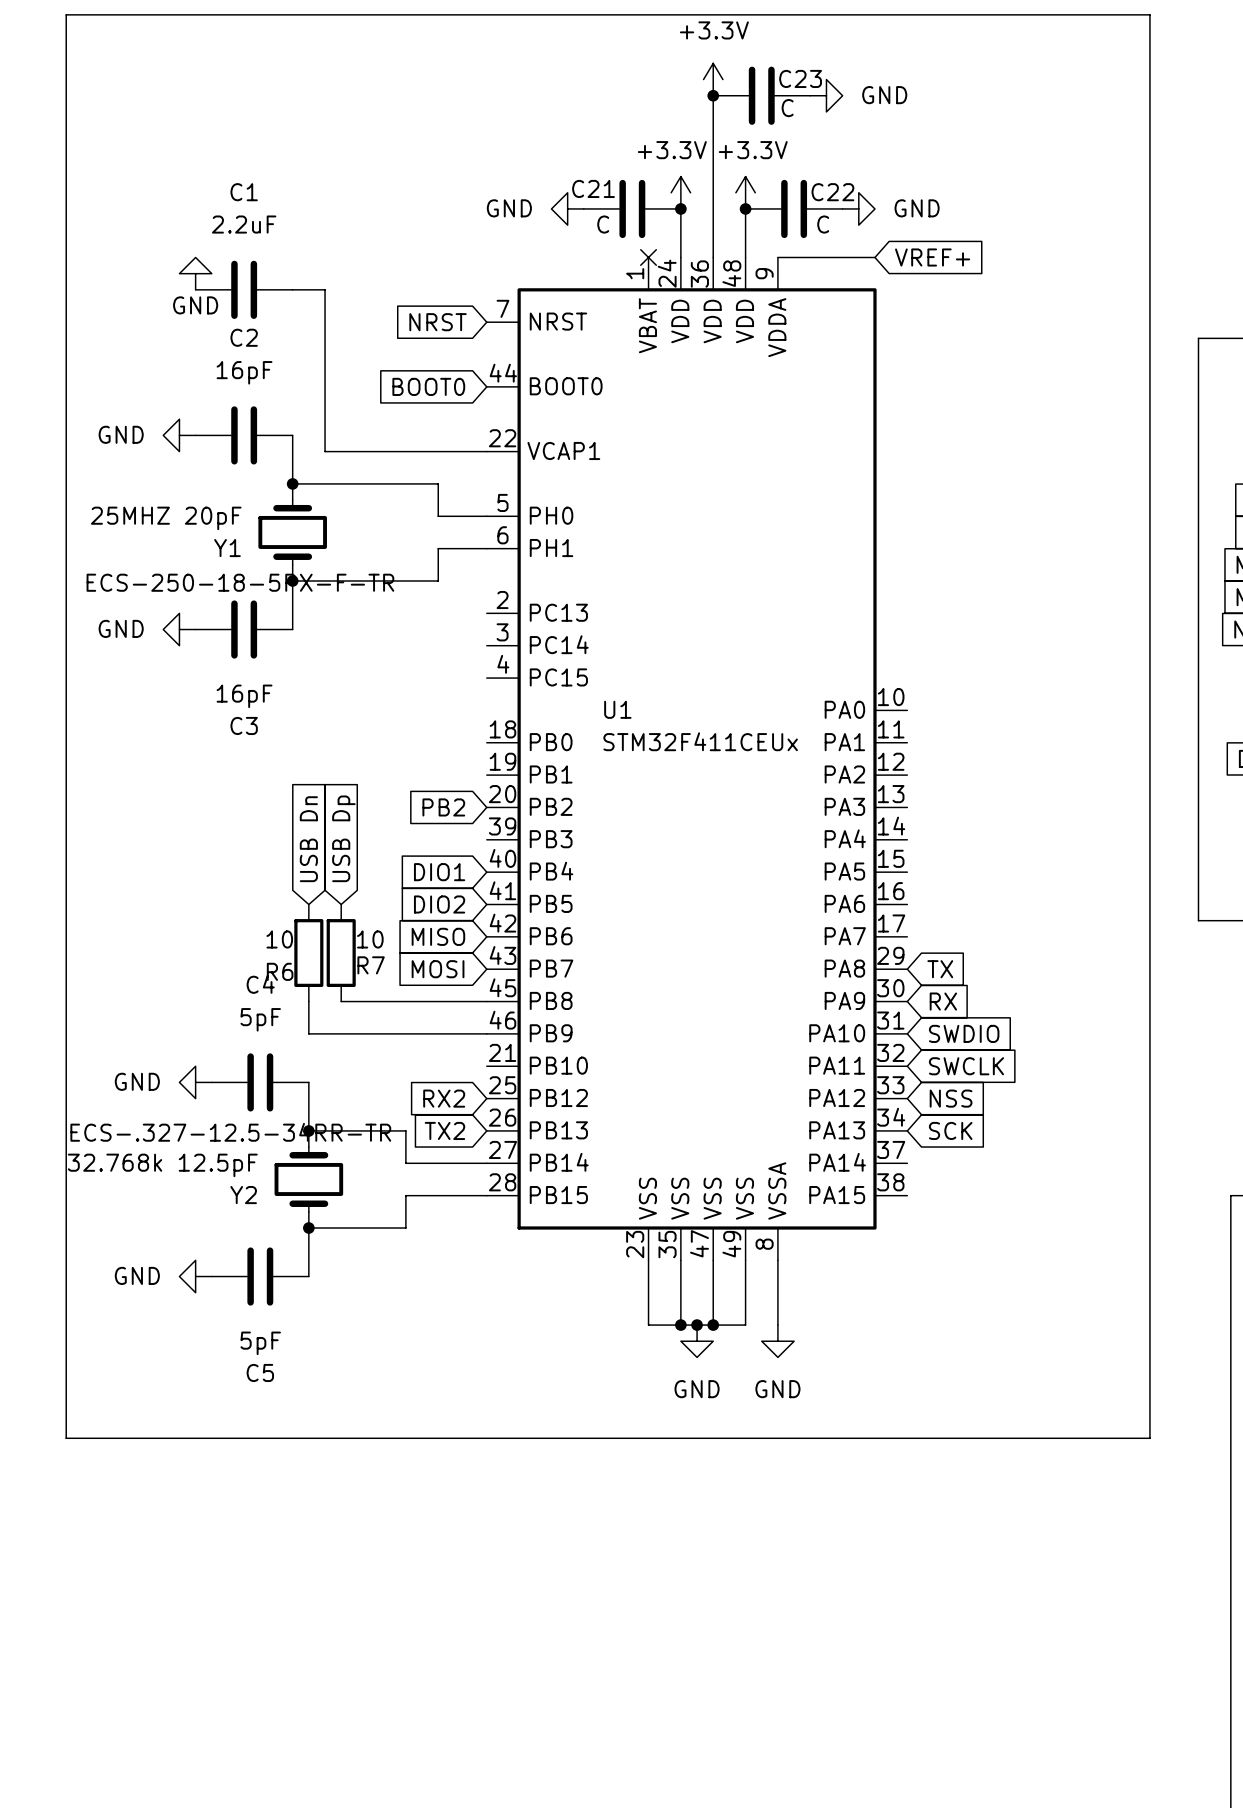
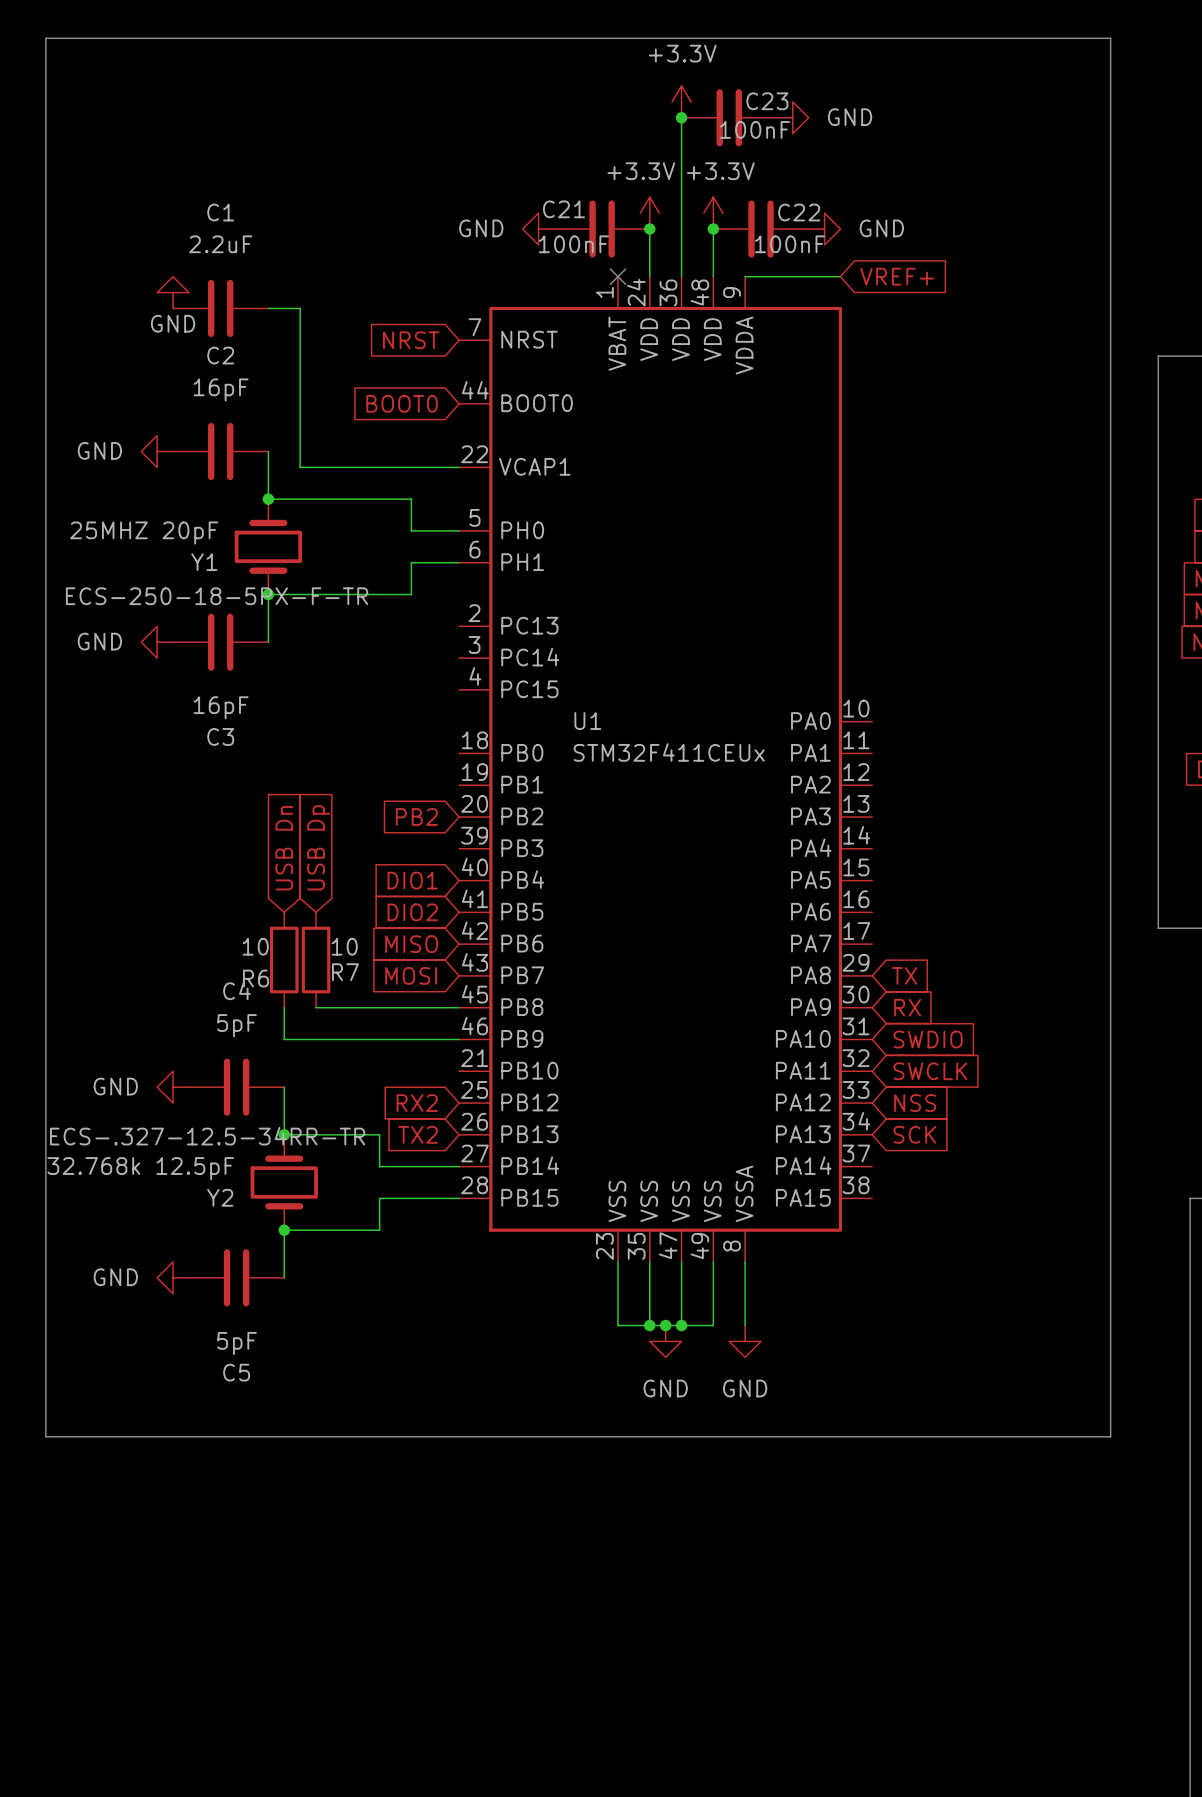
C23 value: C (787, 108) -> 100nF (755, 129)
C21 value: C (603, 224) -> 100nF (573, 244)
C22 value: C (823, 224) -> 100nF (790, 244)

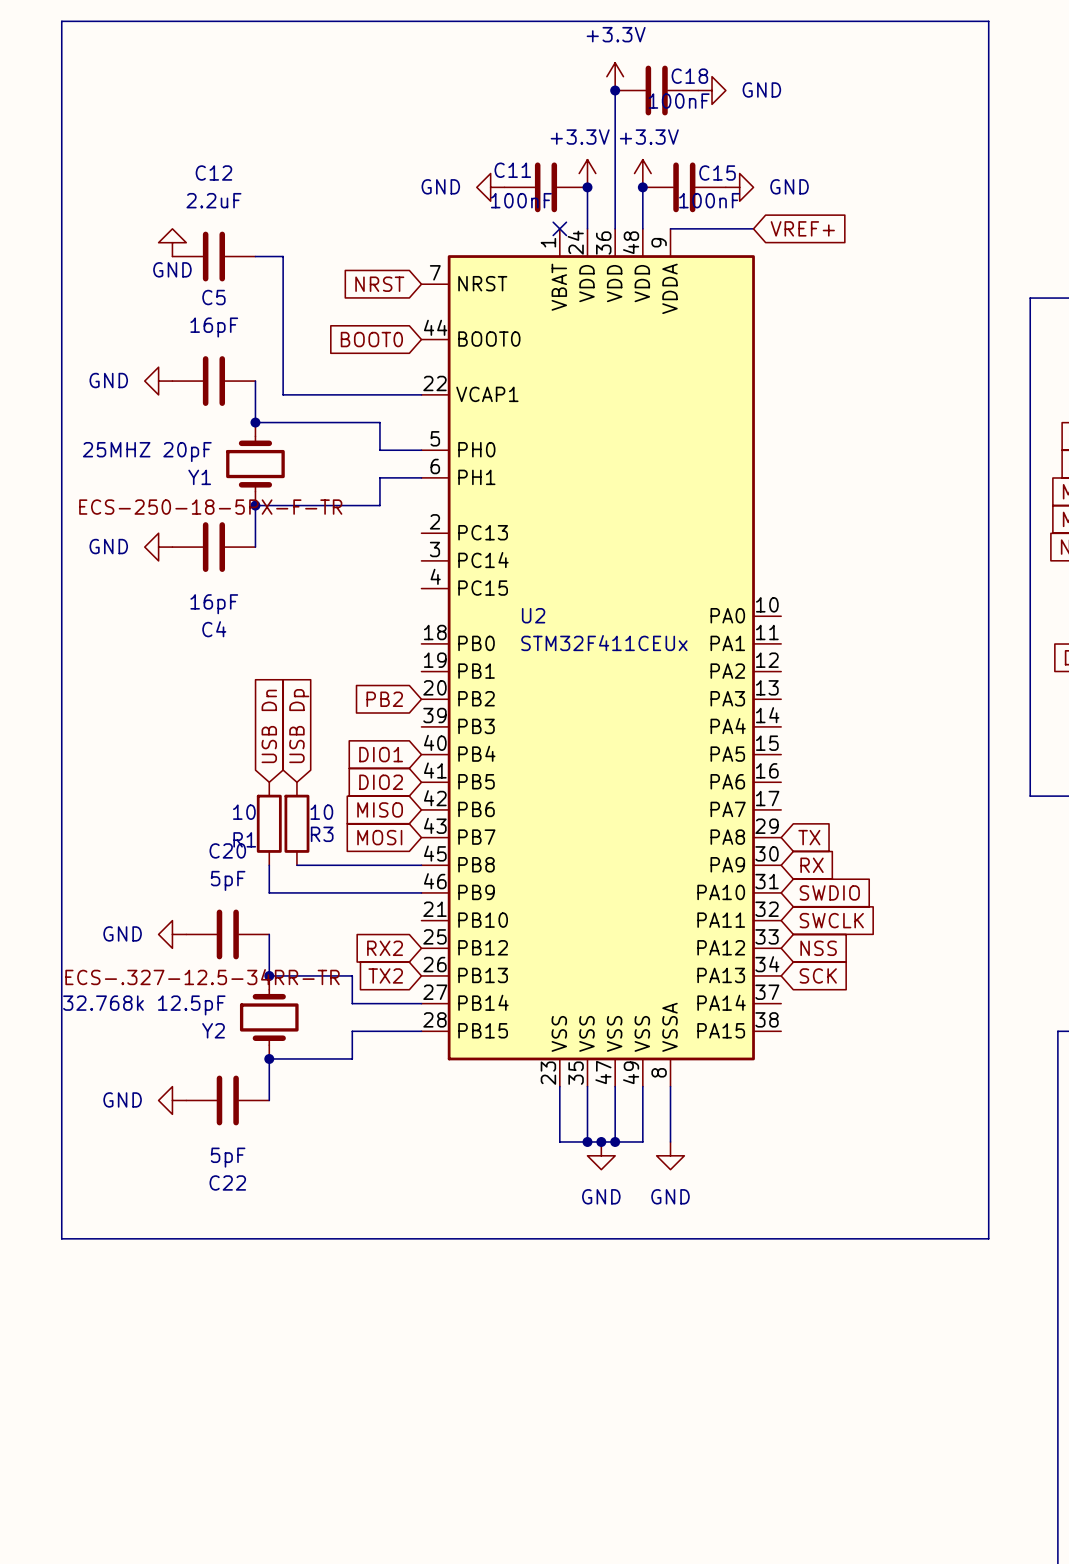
C23 name: C23 (767, 101) -> C18 (689, 76)
C21 name: C21 (563, 209) -> C11 (512, 170)
C1 name: C1 (220, 212) -> C12 (213, 173)
C22 name: C22 (799, 212) -> C15 (717, 173)
C2 name: C2 (220, 355) -> C5 (213, 297)
U1 name: U1 (587, 721) -> U2 (533, 615)
C3 name: C3 (220, 736) -> C4 (214, 629)
R7 name: R7 (345, 972) -> R3 (322, 834)
R6 name: R6 (256, 978) -> R1 (244, 839)
C4 name: C4 (236, 990) -> C20 (227, 850)
C5 name: C5 (236, 1372) -> C22 (227, 1182)

